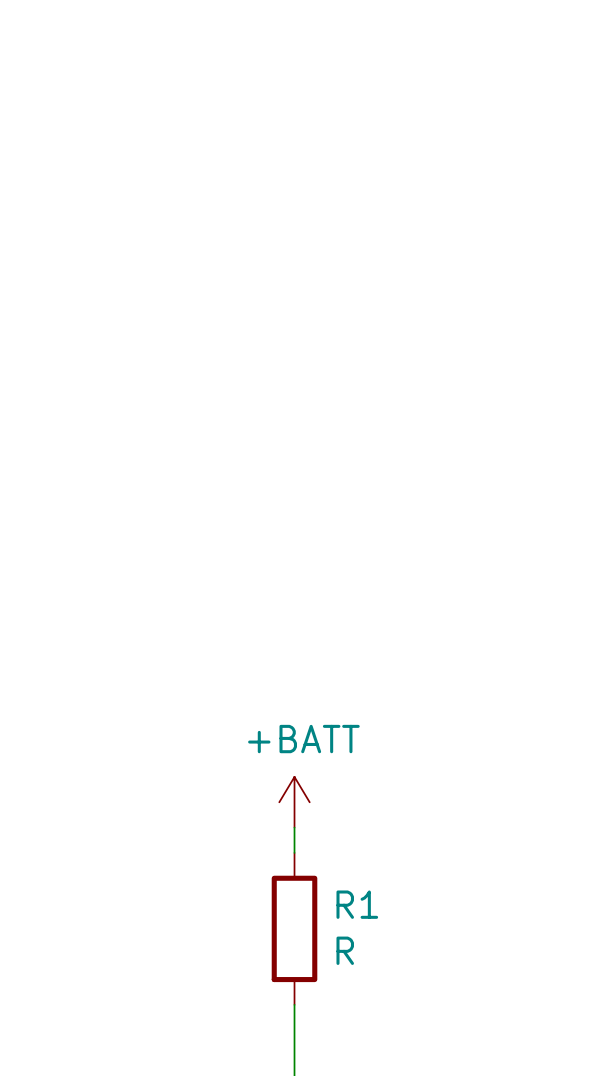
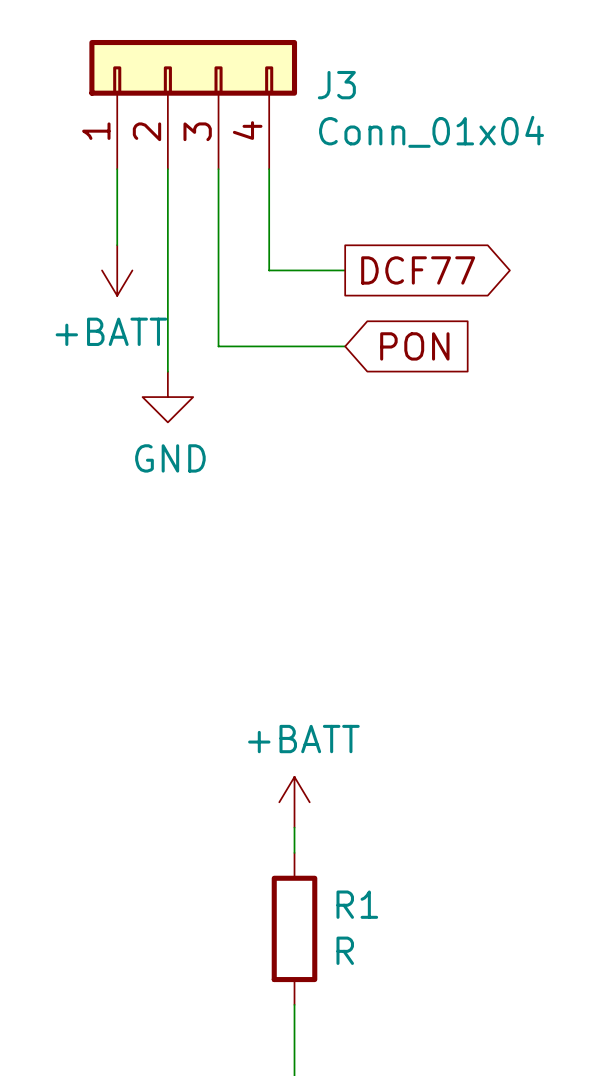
J3: none -> Conn_01x04 (193, 104)
wire: none -> (117, 169) (117, 245)
wire: none -> (167, 169) (167, 371)
wire: none -> (218, 169) (218, 346) (345, 346)
wire: none -> (269, 169) (269, 270) (345, 270)
power symbol: none -> +BATT (117, 270)
global label: none -> DCF77 (418, 270)
global label: none -> PON (414, 346)
power symbol: none -> GND (167, 397)

